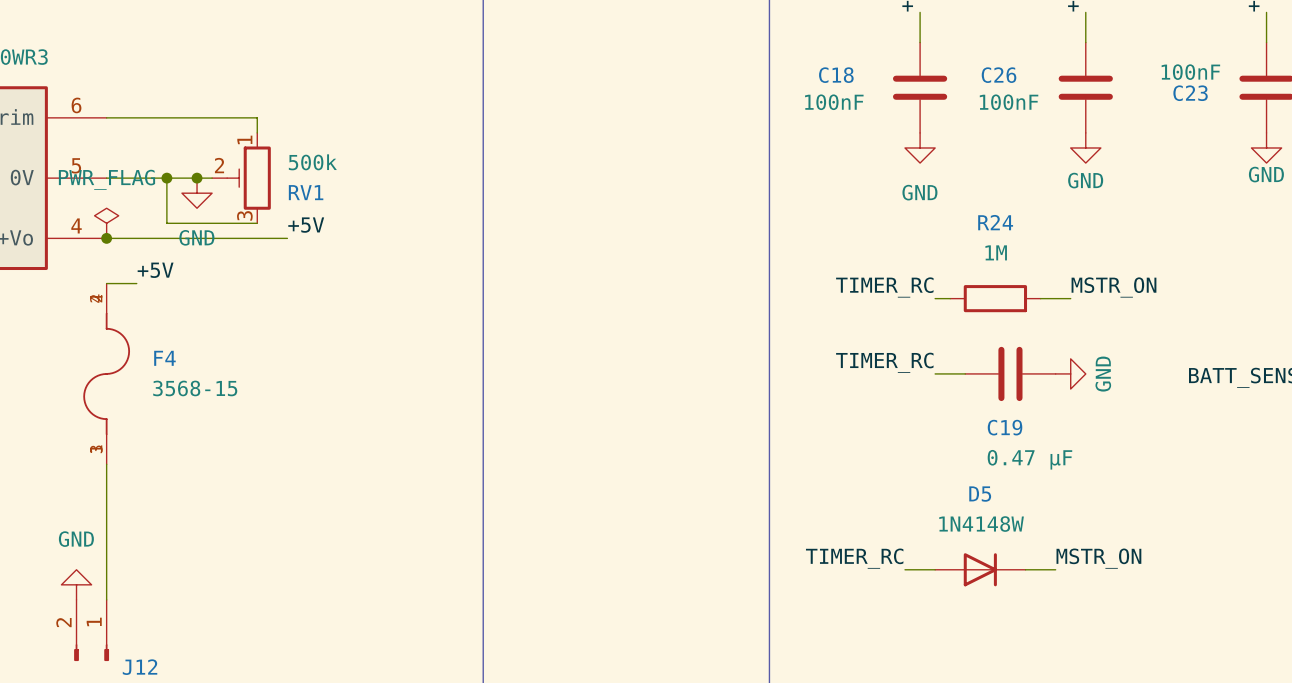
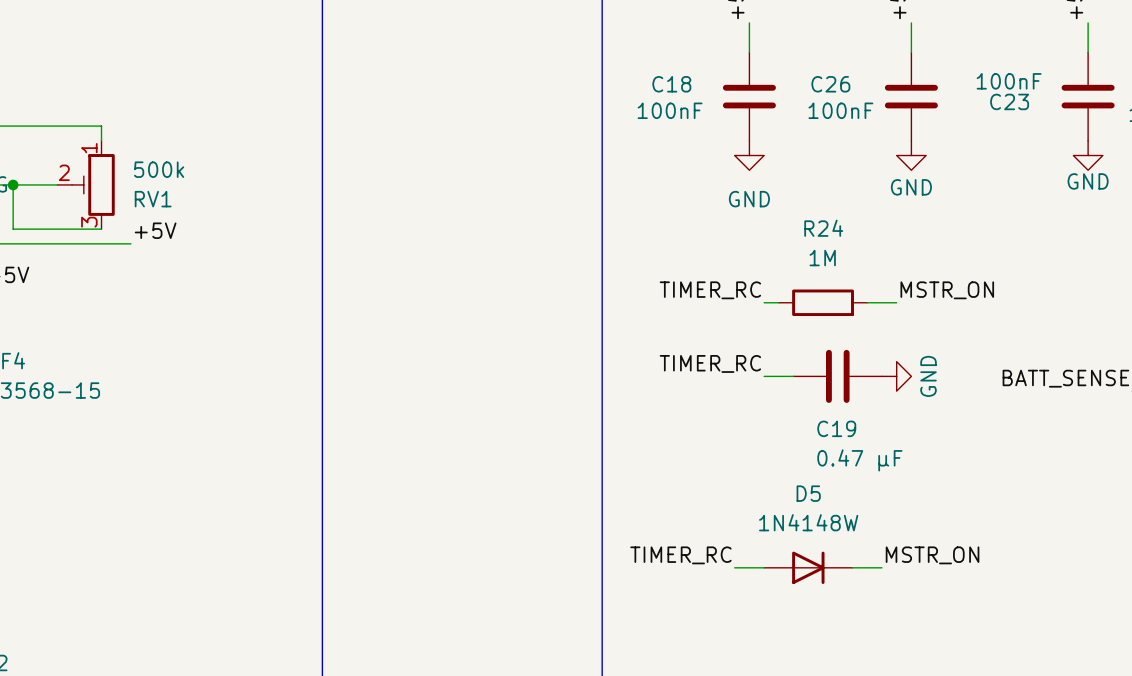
junction: (197, 178) -> none
power symbol: GND (197, 193) -> none

